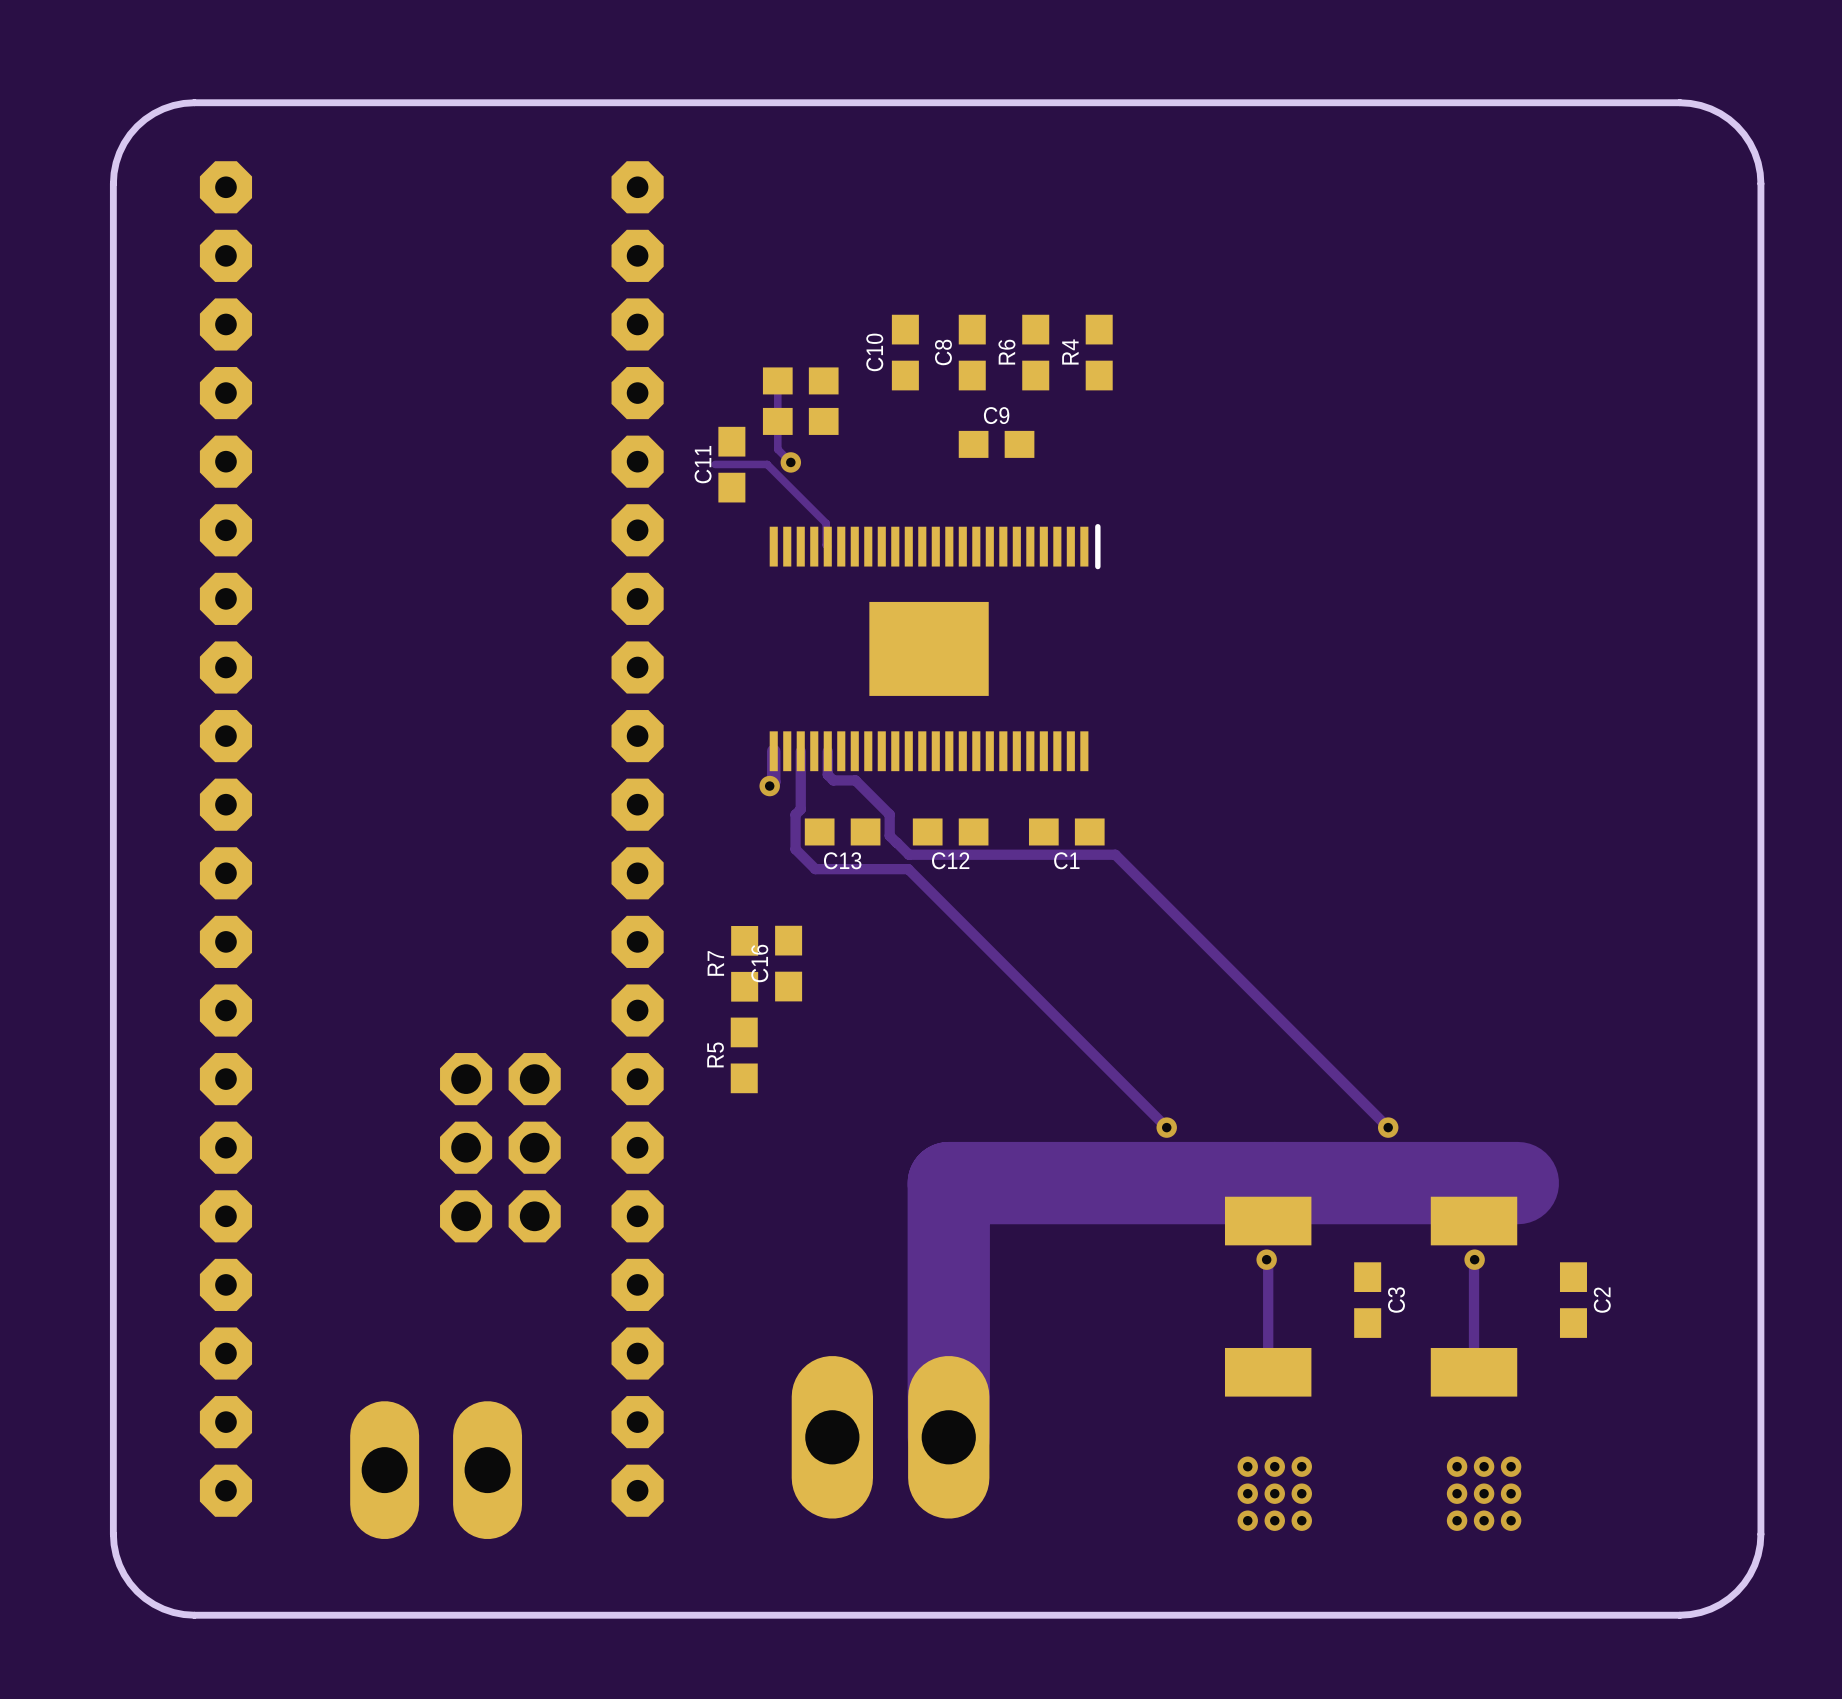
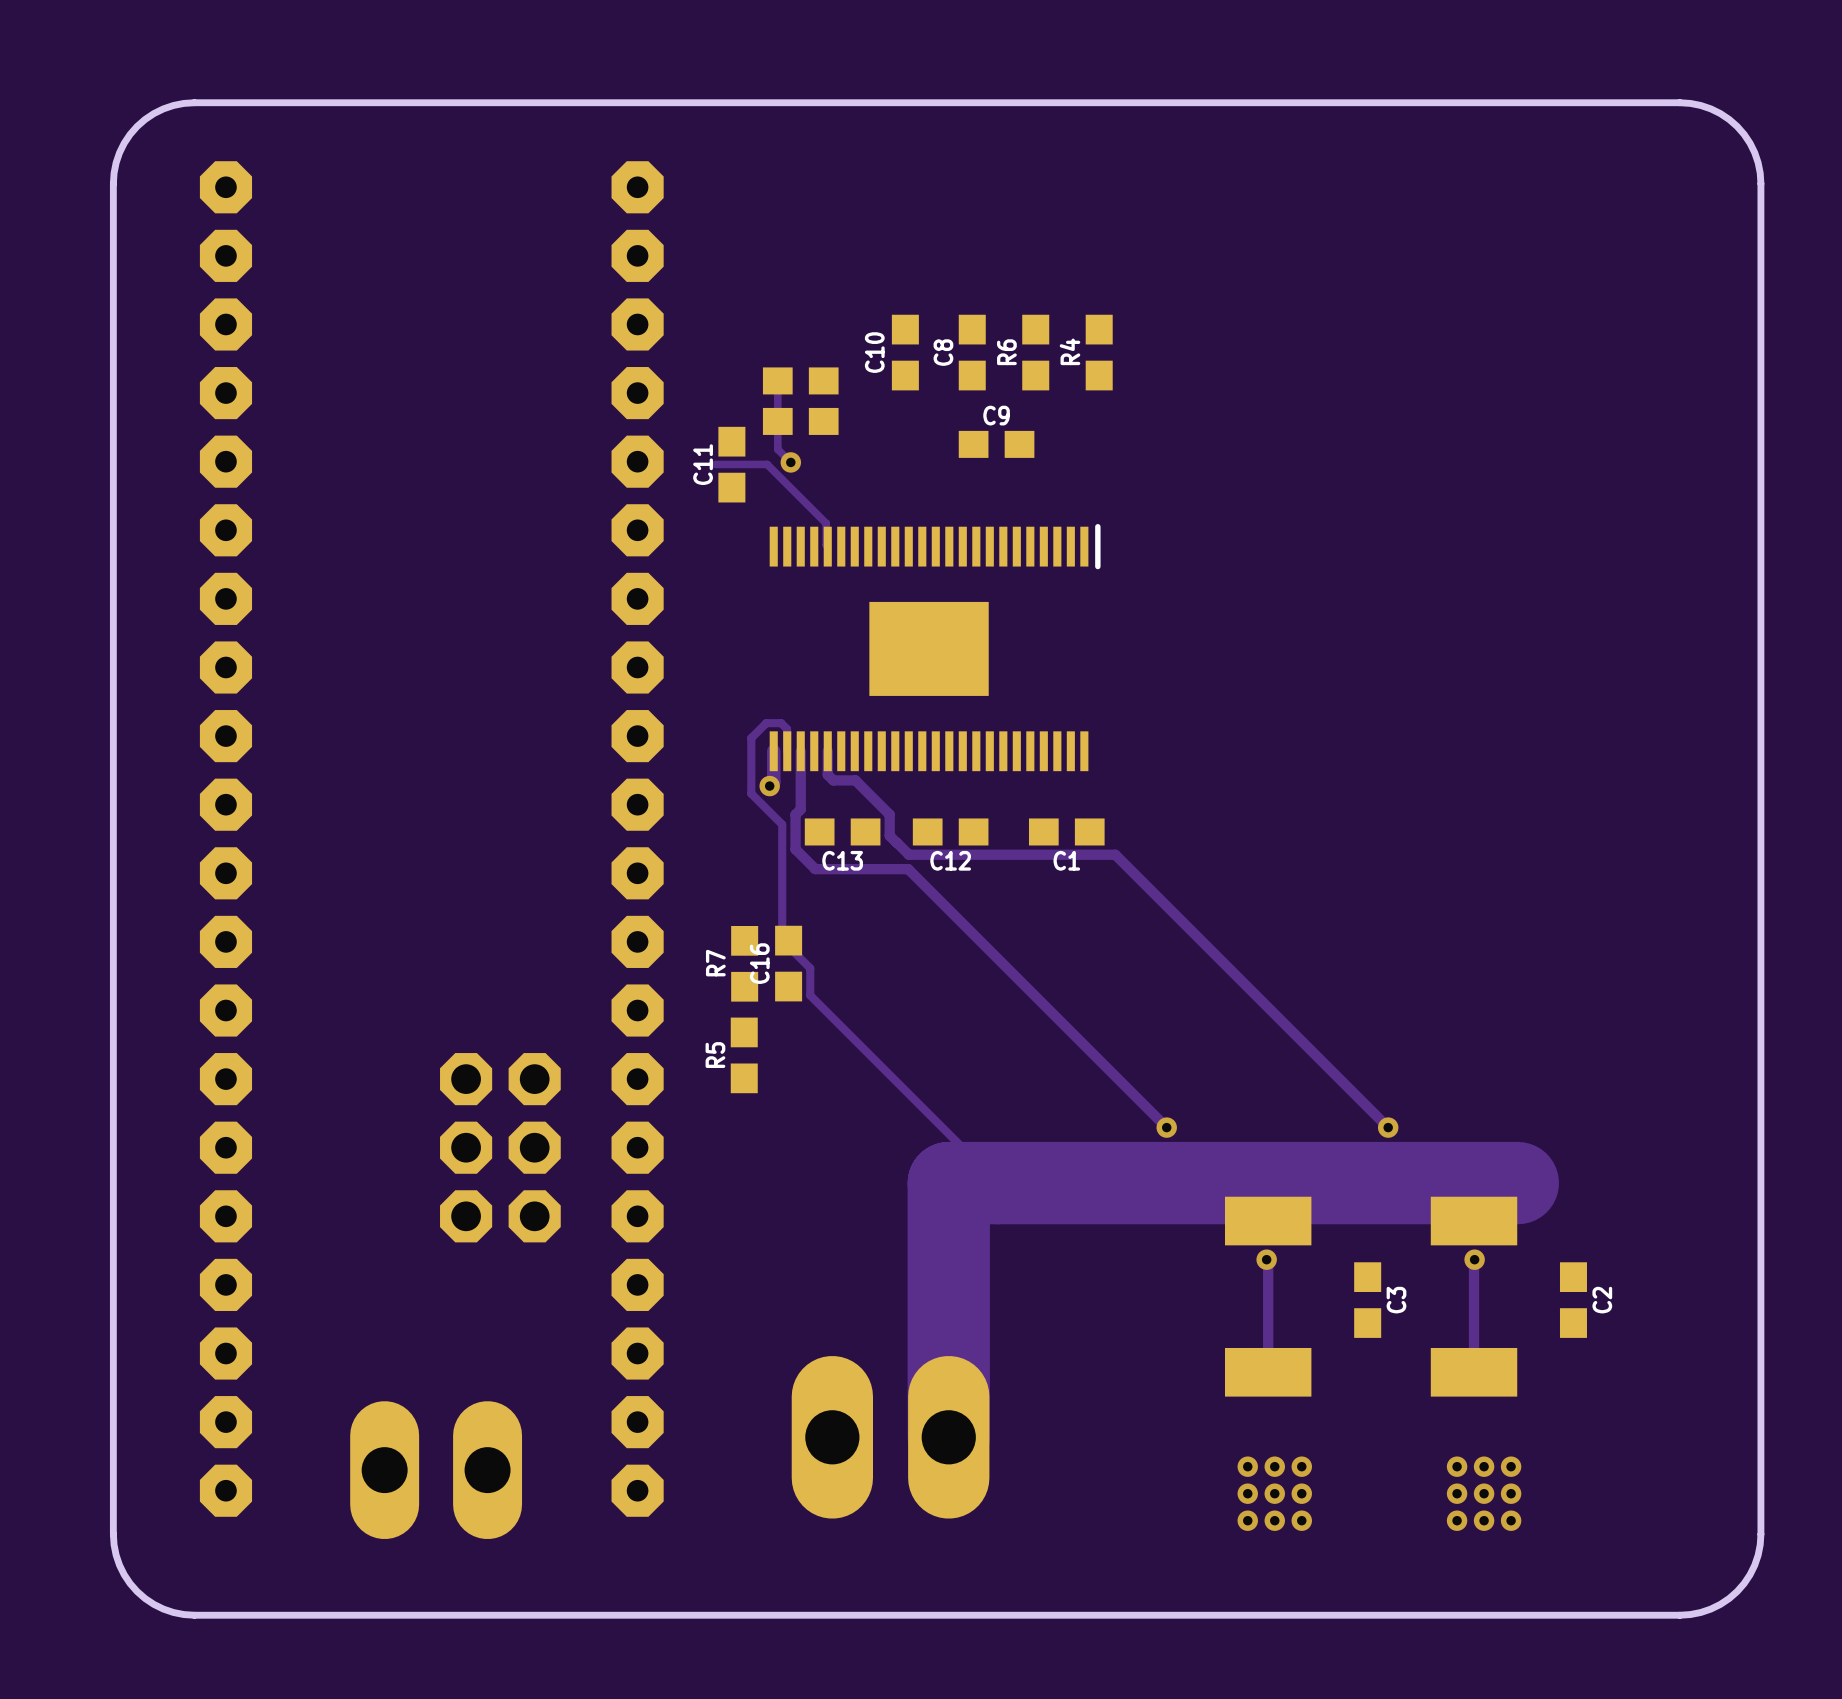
track: none -> (787, 751) (787, 729) (781, 723) (766, 723) (751, 738) (751, 793) (782, 824) (782, 940) (810, 968) (810, 995) (997, 1183)

